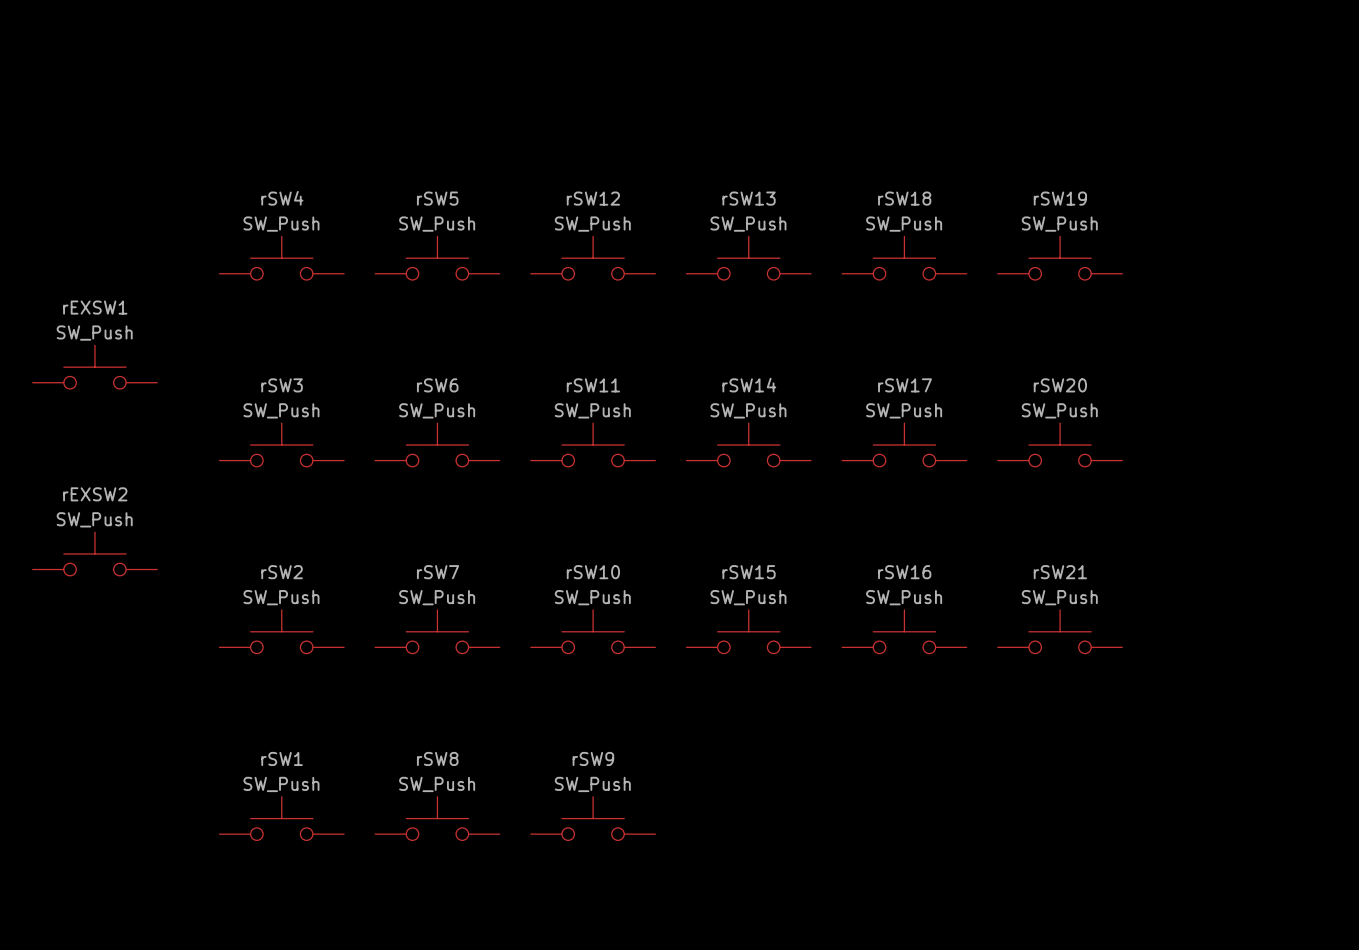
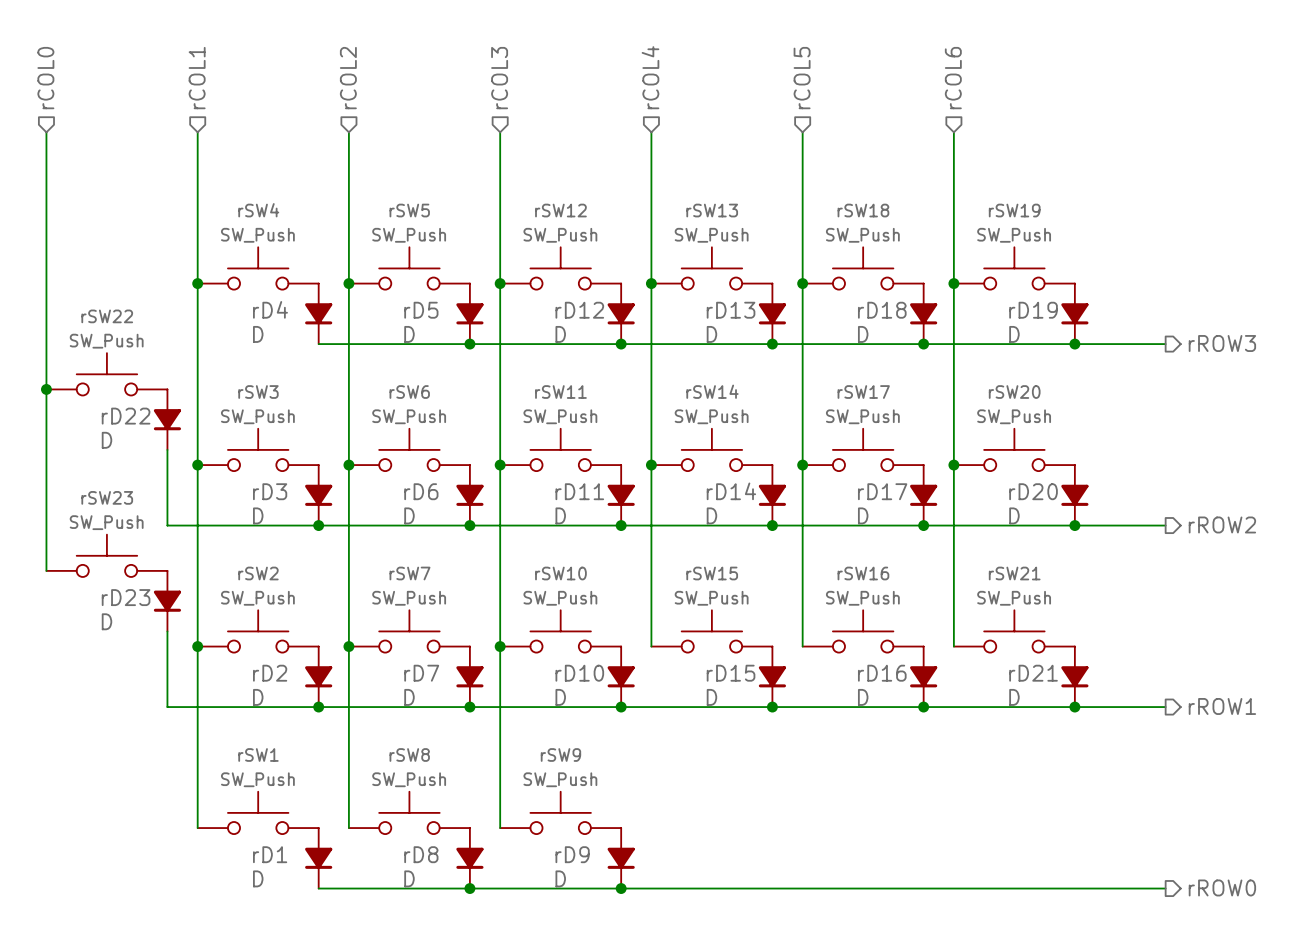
hierarchical label: none -> rCOL4 (650, 77)
hierarchical label: none -> rCOL0 (45, 78)
hierarchical label: none -> rCOL1 (197, 78)
hierarchical label: none -> rCOL2 (348, 78)
hierarchical label: none -> rCOL3 (499, 78)
hierarchical label: none -> rCOL5 (802, 78)
hierarchical label: none -> rCOL6 (953, 78)
wire: none -> (46, 132) (46, 570)
wire: none -> (197, 132) (197, 828)
wire: none -> (348, 132) (348, 828)
wire: none -> (500, 132) (500, 828)
wire: none -> (651, 132) (651, 646)
wire: none -> (802, 132) (802, 646)
wire: none -> (953, 132) (953, 646)
junction: none -> (197, 283)
junction: none -> (348, 283)
junction: none -> (500, 283)
junction: none -> (651, 283)
junction: none -> (802, 283)
junction: none -> (953, 283)
rD4: none -> D (318, 313)
rD5: none -> D (469, 313)
rD12: none -> D (621, 313)
rD13: none -> D (772, 313)
rD18: none -> D (923, 313)
rD19: none -> D (1074, 313)
hierarchical label: none -> rROW3 (1222, 343)
wire: none -> (318, 344) (1165, 344)
junction: none -> (469, 344)
junction: none -> (621, 344)
junction: none -> (772, 344)
junction: none -> (923, 344)
junction: none -> (1074, 344)
rEXSW1: SW_Push (94, 367) -> none
rSW22: none -> SW_Push (106, 374)
junction: none -> (46, 389)
rD22: none -> D (167, 419)
wire: none -> (167, 449) (167, 525) (1165, 525)
junction: none -> (197, 465)
junction: none -> (348, 465)
junction: none -> (500, 465)
junction: none -> (651, 465)
junction: none -> (802, 465)
junction: none -> (953, 465)
rD3: none -> D (318, 495)
rD6: none -> D (469, 495)
rD11: none -> D (621, 495)
rD14: none -> D (772, 495)
rD17: none -> D (923, 495)
rD20: none -> D (1074, 495)
junction: none -> (318, 525)
junction: none -> (469, 525)
junction: none -> (621, 525)
junction: none -> (772, 525)
junction: none -> (923, 525)
junction: none -> (1074, 525)
hierarchical label: none -> rROW2 (1222, 524)
rEXSW2: SW_Push (94, 553) -> none
rSW23: none -> SW_Push (106, 555)
rD23: none -> D (167, 601)
wire: none -> (167, 631) (167, 707) (1165, 707)
junction: none -> (197, 646)
junction: none -> (348, 646)
junction: none -> (500, 646)
rD2: none -> D (318, 676)
rD7: none -> D (469, 676)
rD10: none -> D (621, 676)
rD15: none -> D (772, 676)
rD16: none -> D (923, 676)
rD21: none -> D (1074, 676)
junction: none -> (318, 707)
junction: none -> (469, 707)
junction: none -> (621, 707)
junction: none -> (772, 707)
junction: none -> (923, 707)
junction: none -> (1074, 707)
hierarchical label: none -> rROW1 (1222, 706)
rD1: none -> D (318, 858)
rD8: none -> D (469, 858)
rD9: none -> D (621, 858)
hierarchical label: none -> rROW0 (1222, 887)
wire: none -> (318, 888) (1165, 888)
junction: none -> (469, 888)
junction: none -> (621, 888)

